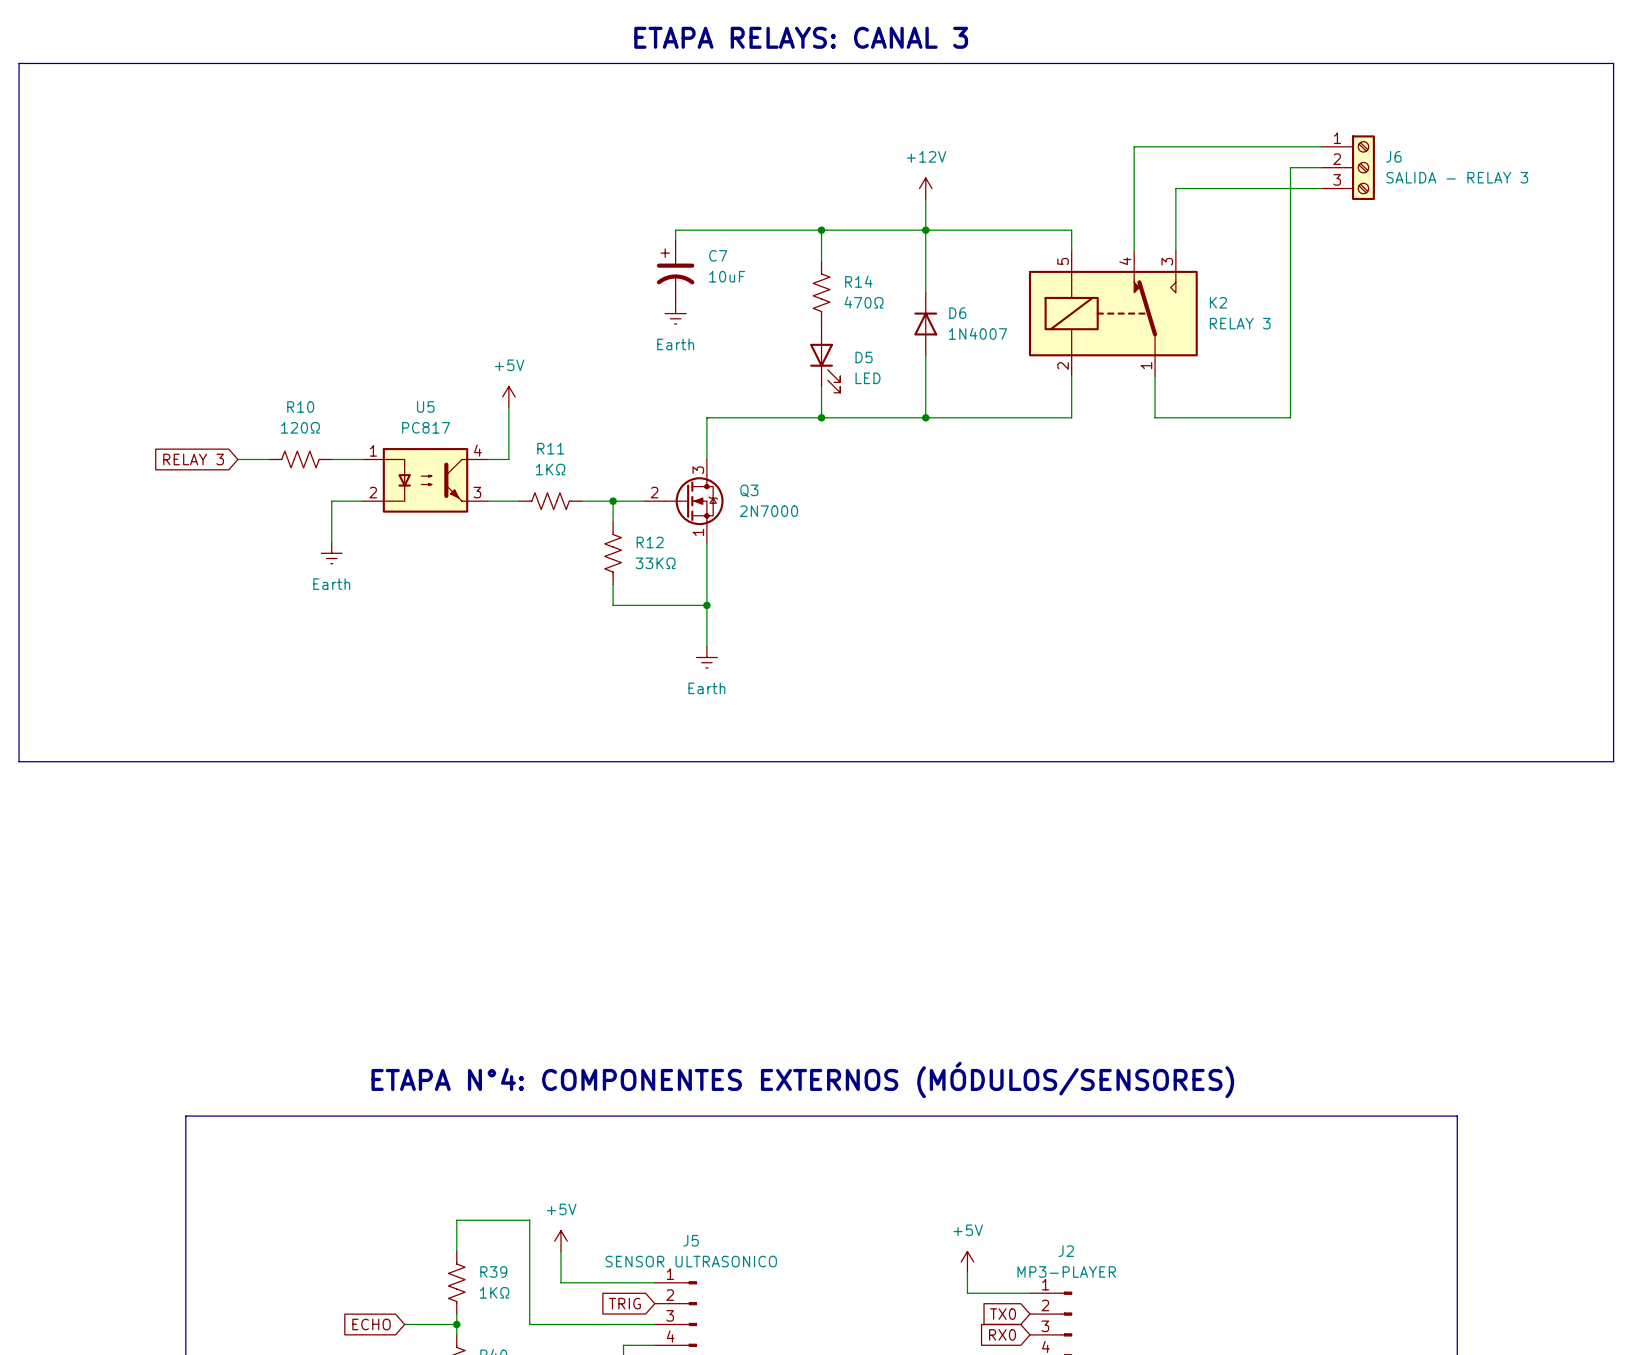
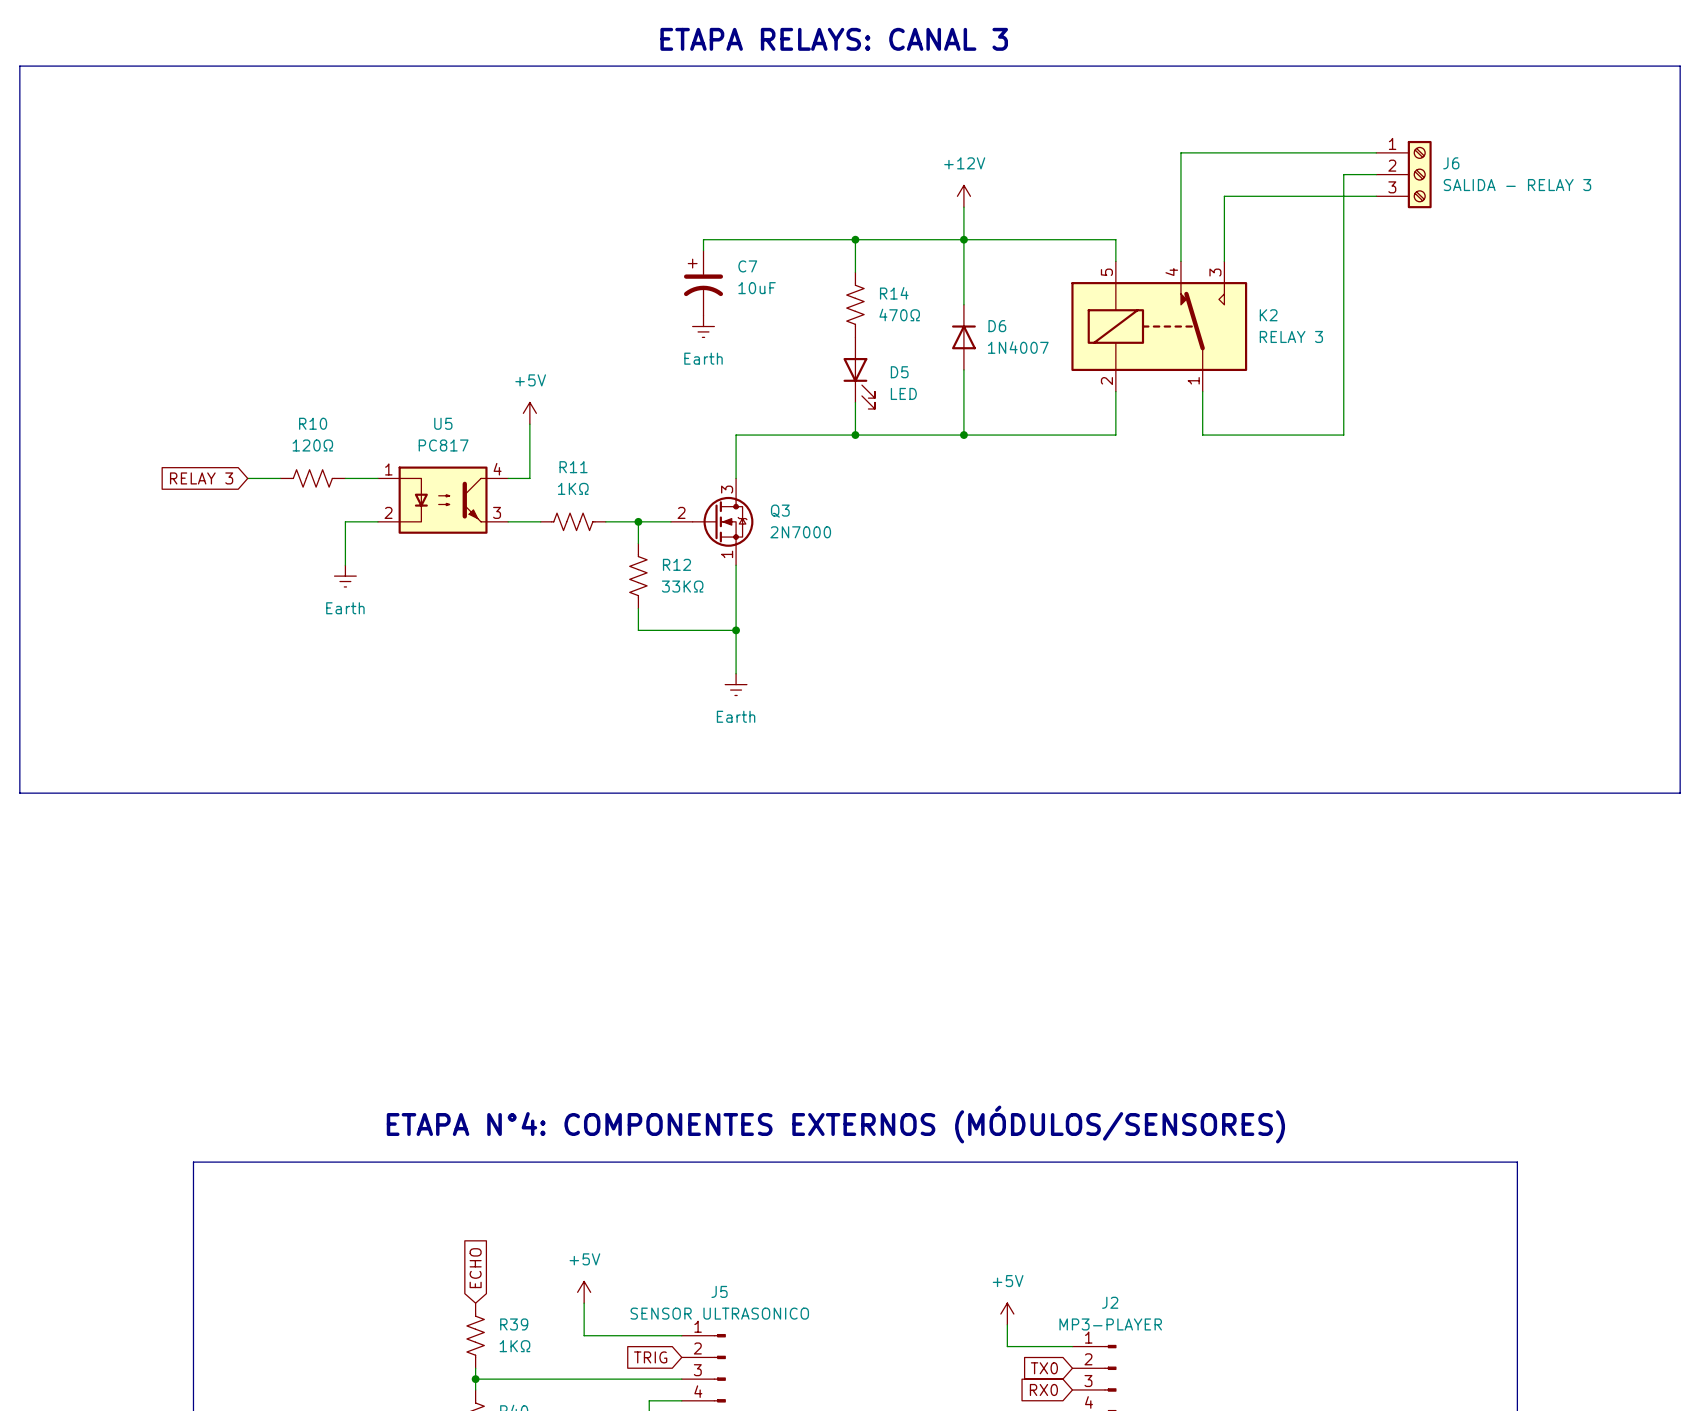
wire: (456, 1251) (456, 1220) (529, 1220) (529, 1324) -> (475, 1379) (551, 1379)
global label rotation: 0° (371, 1324) -> 90° clockwise (475, 1268)
global label position: ECHO (371, 1324) -> ECHO (475, 1268)
wire: (404, 1324) (456, 1324) -> none

